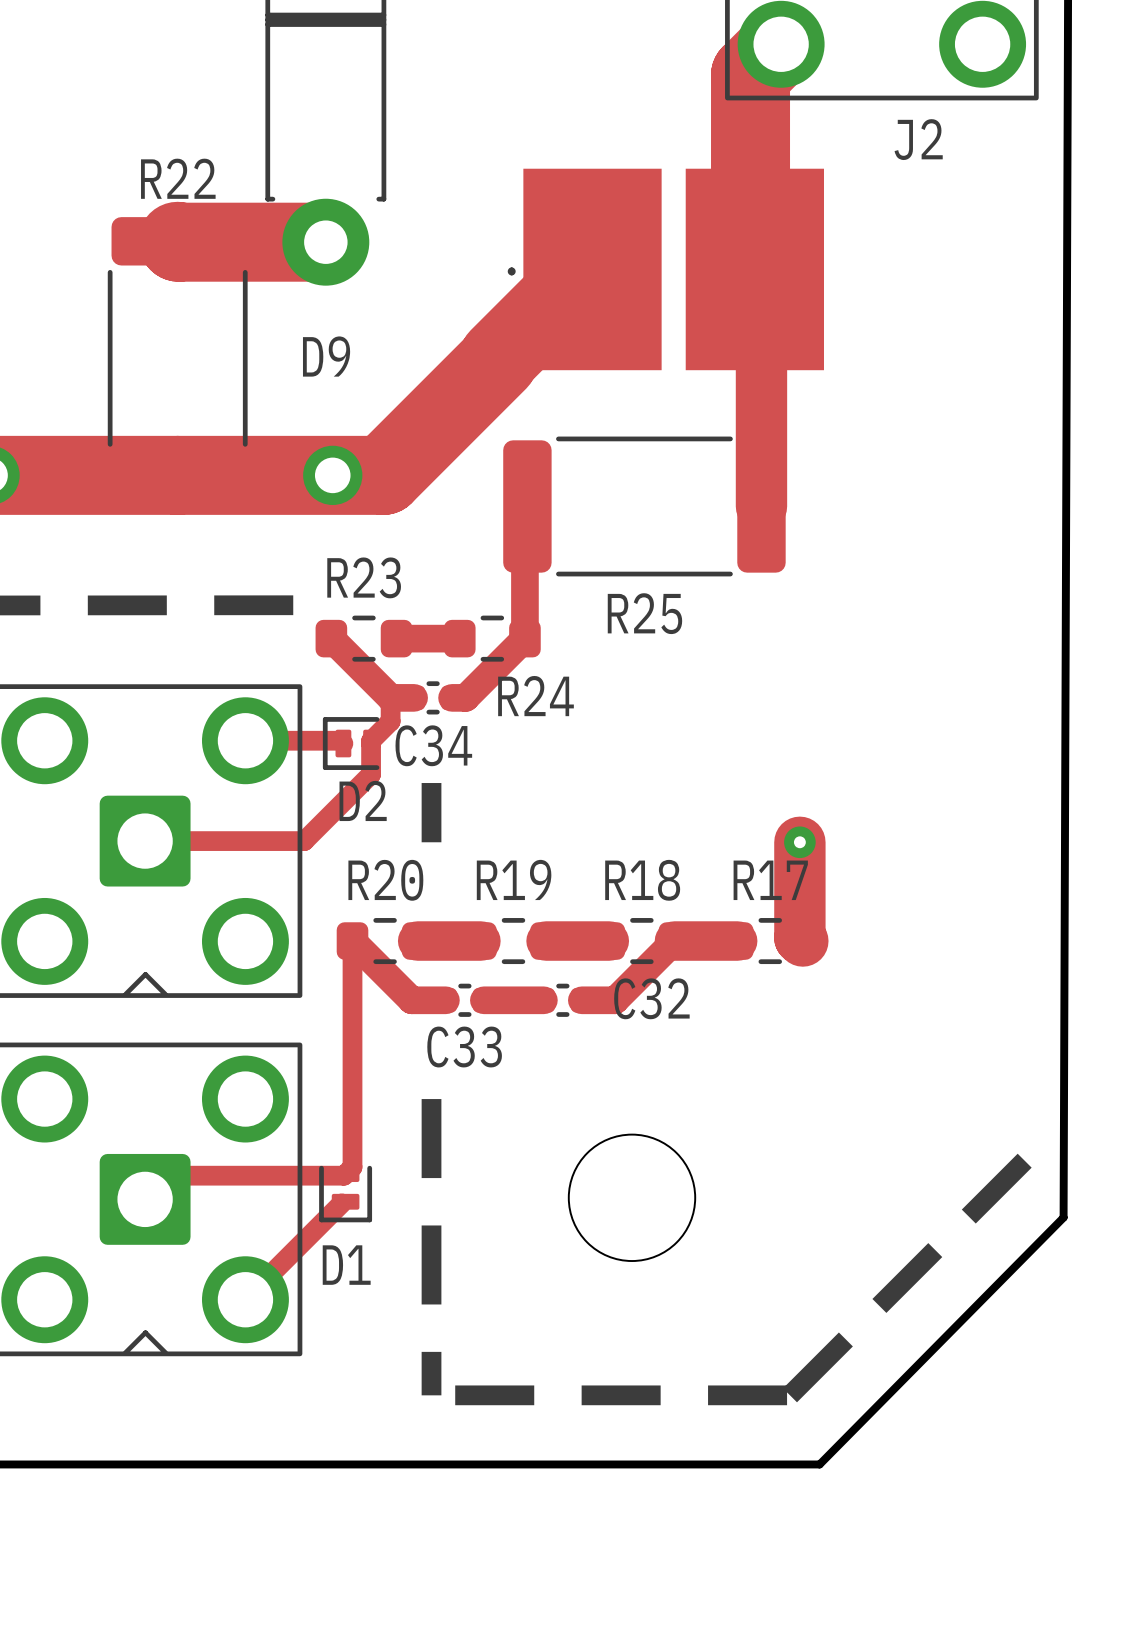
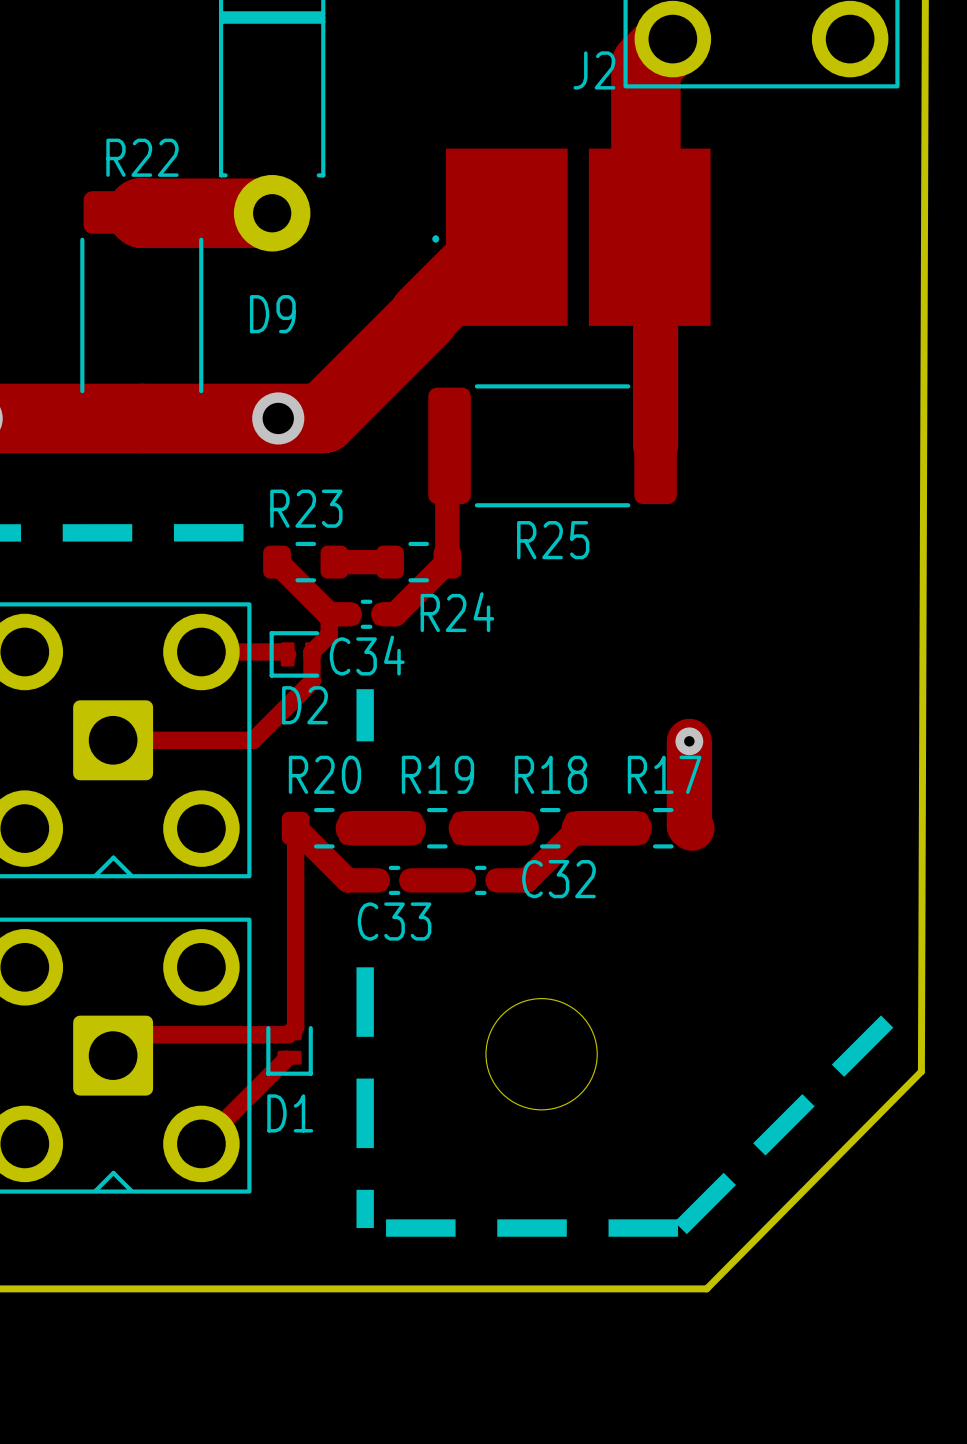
J2 name position: J2 (918, 139) -> J2 (594, 70)

